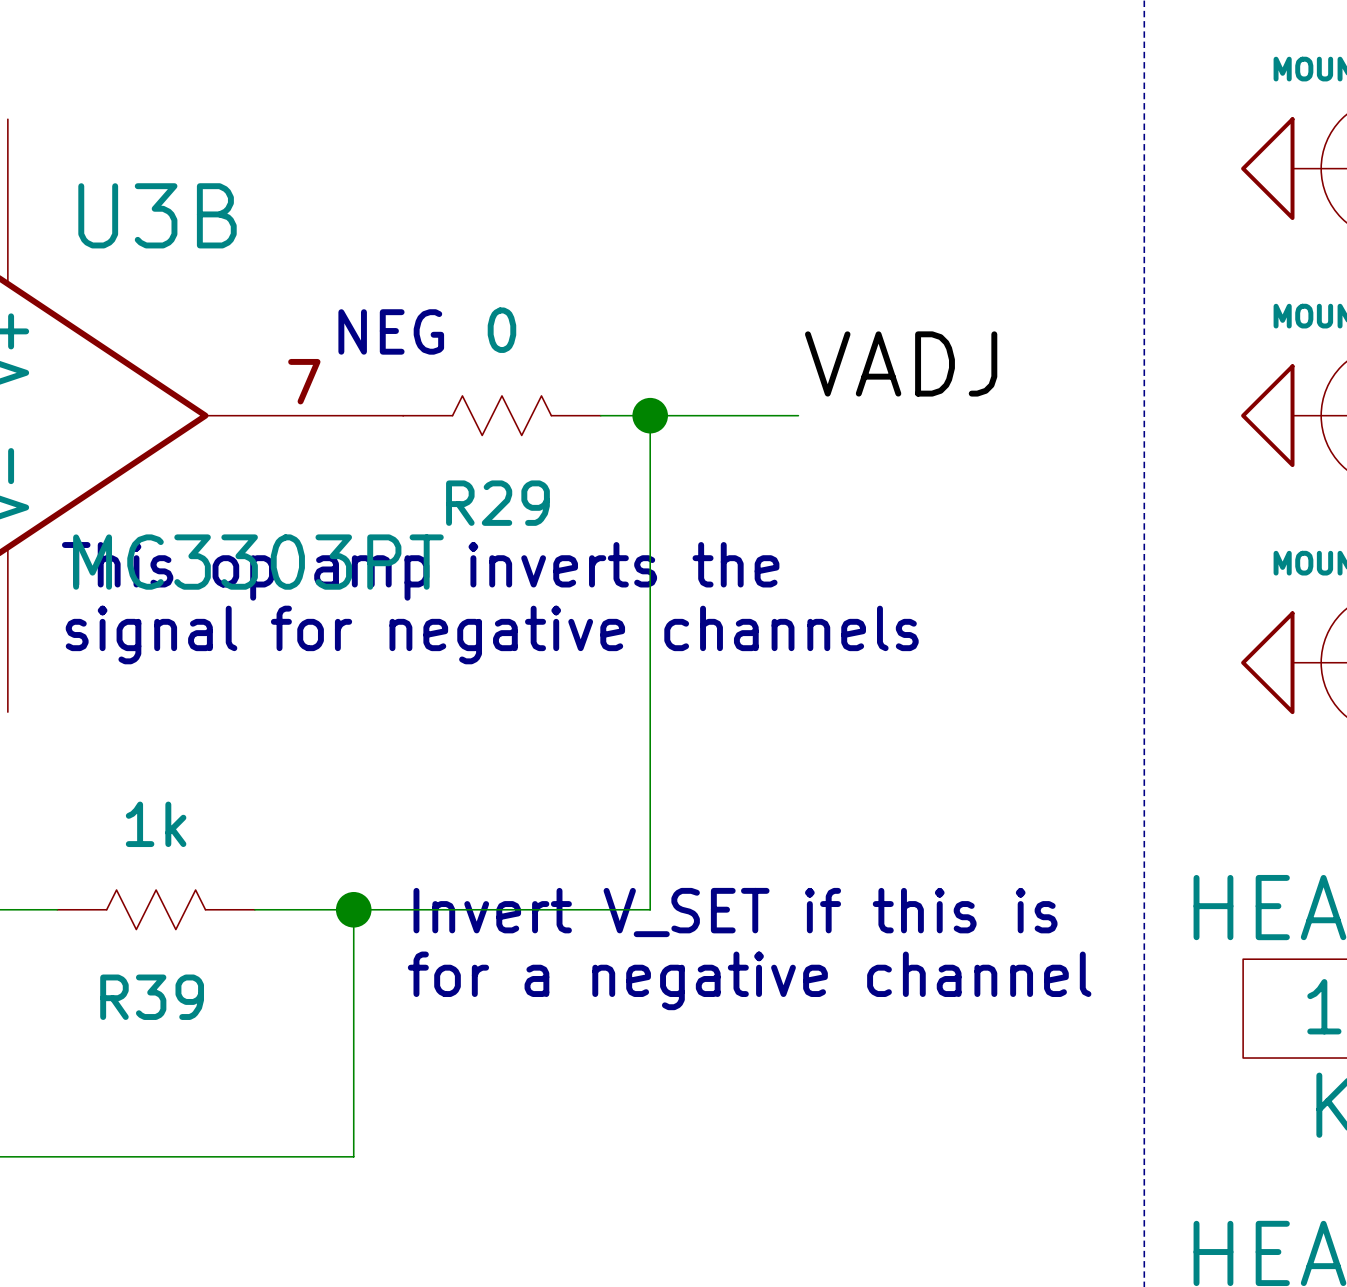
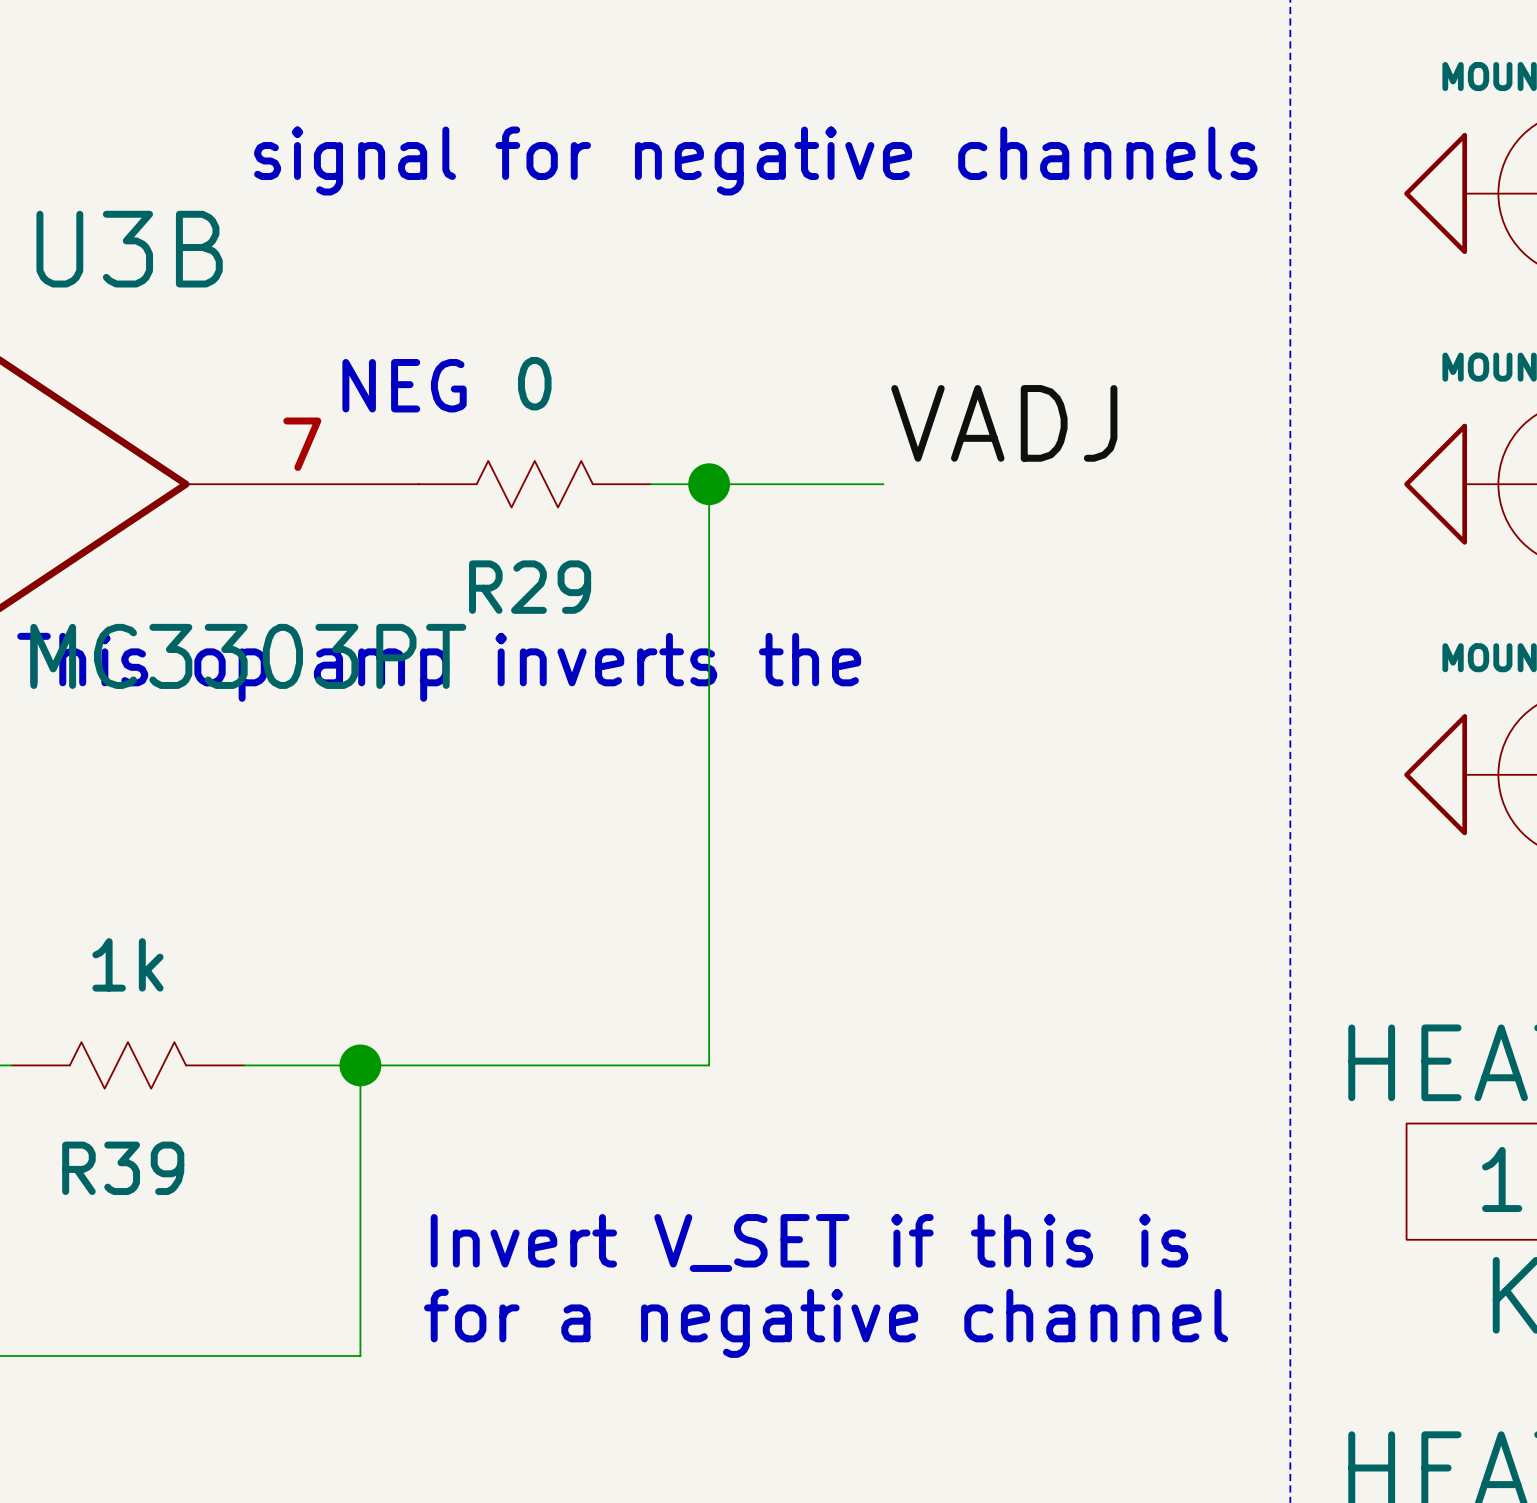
text position: signal for negative channels (492, 634) -> signal for negative channels (755, 161)
text position: Invert V_SET if this is (735, 912) -> Invert V_SET if this is (809, 1242)
text position: for a negative channel (749, 980) -> for a negative channel (826, 1323)

